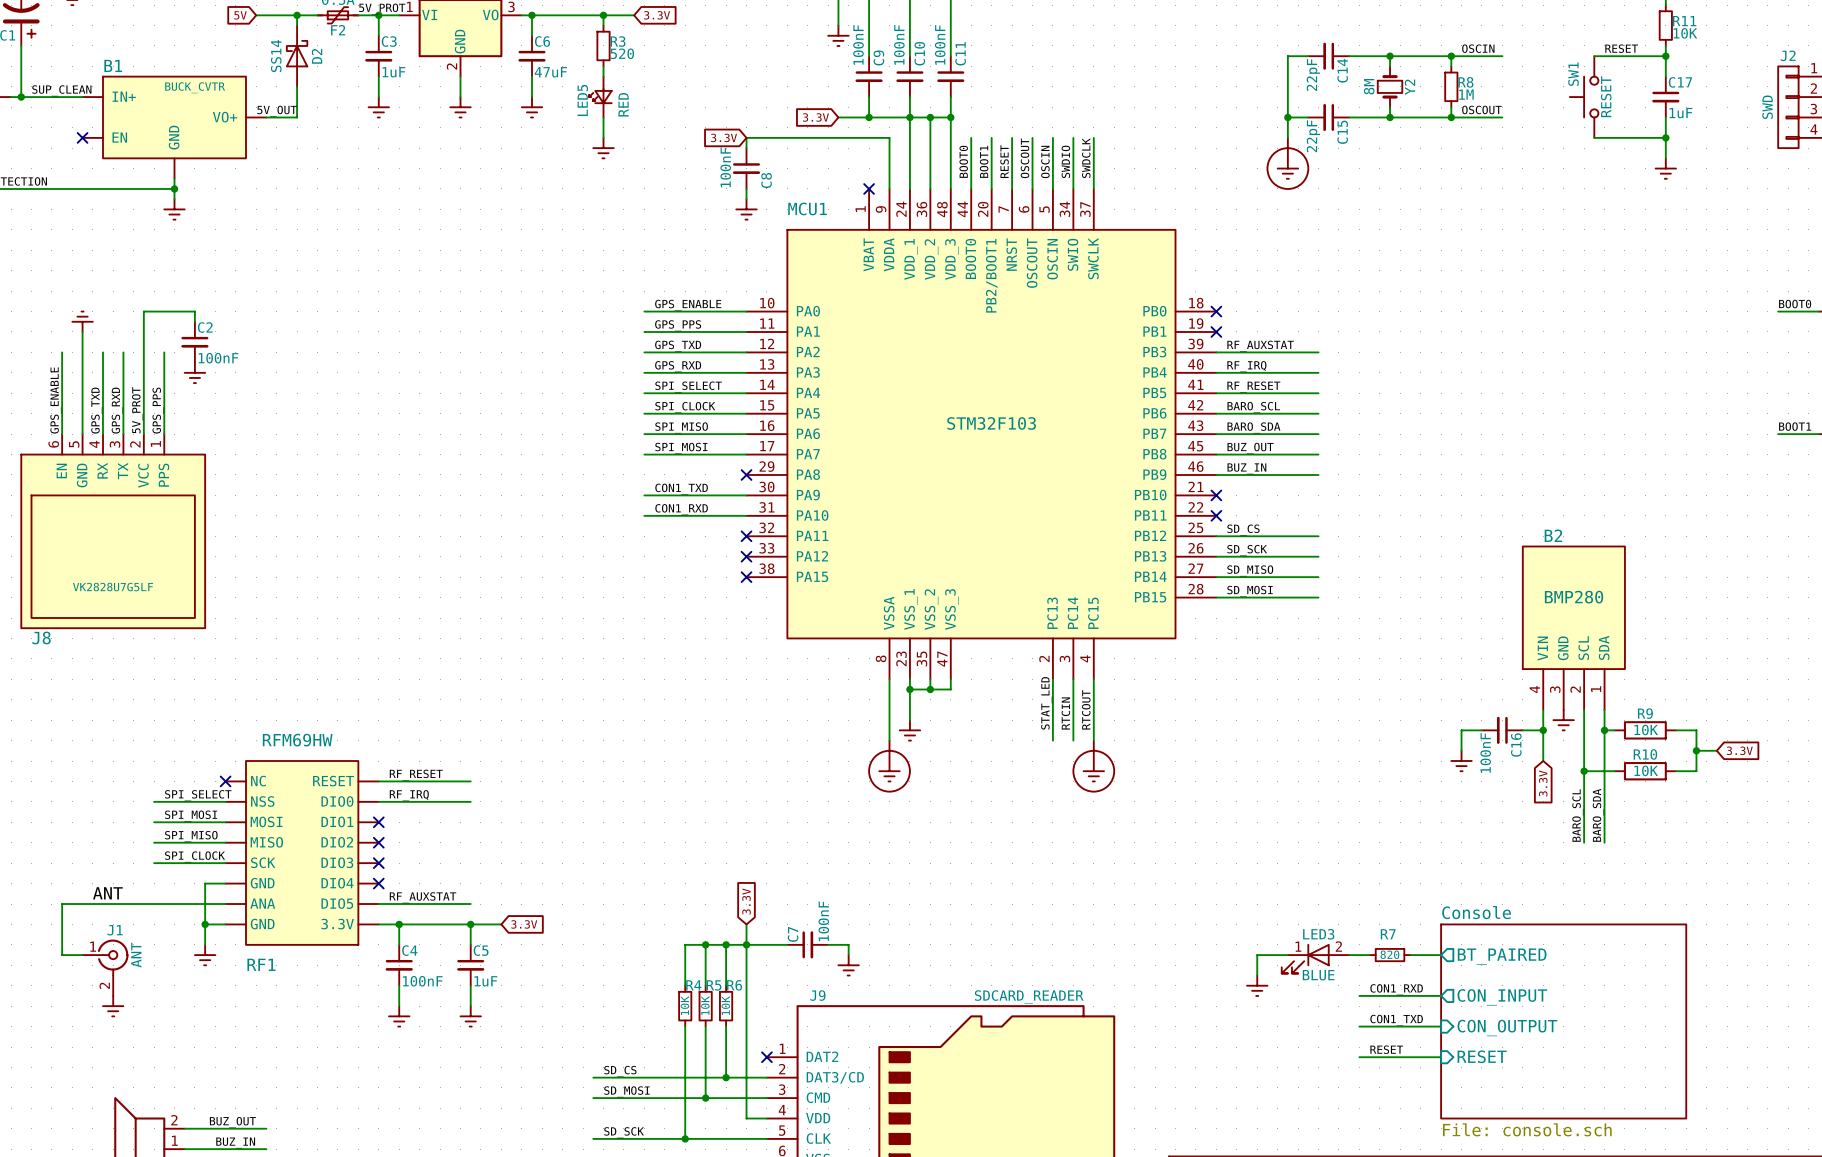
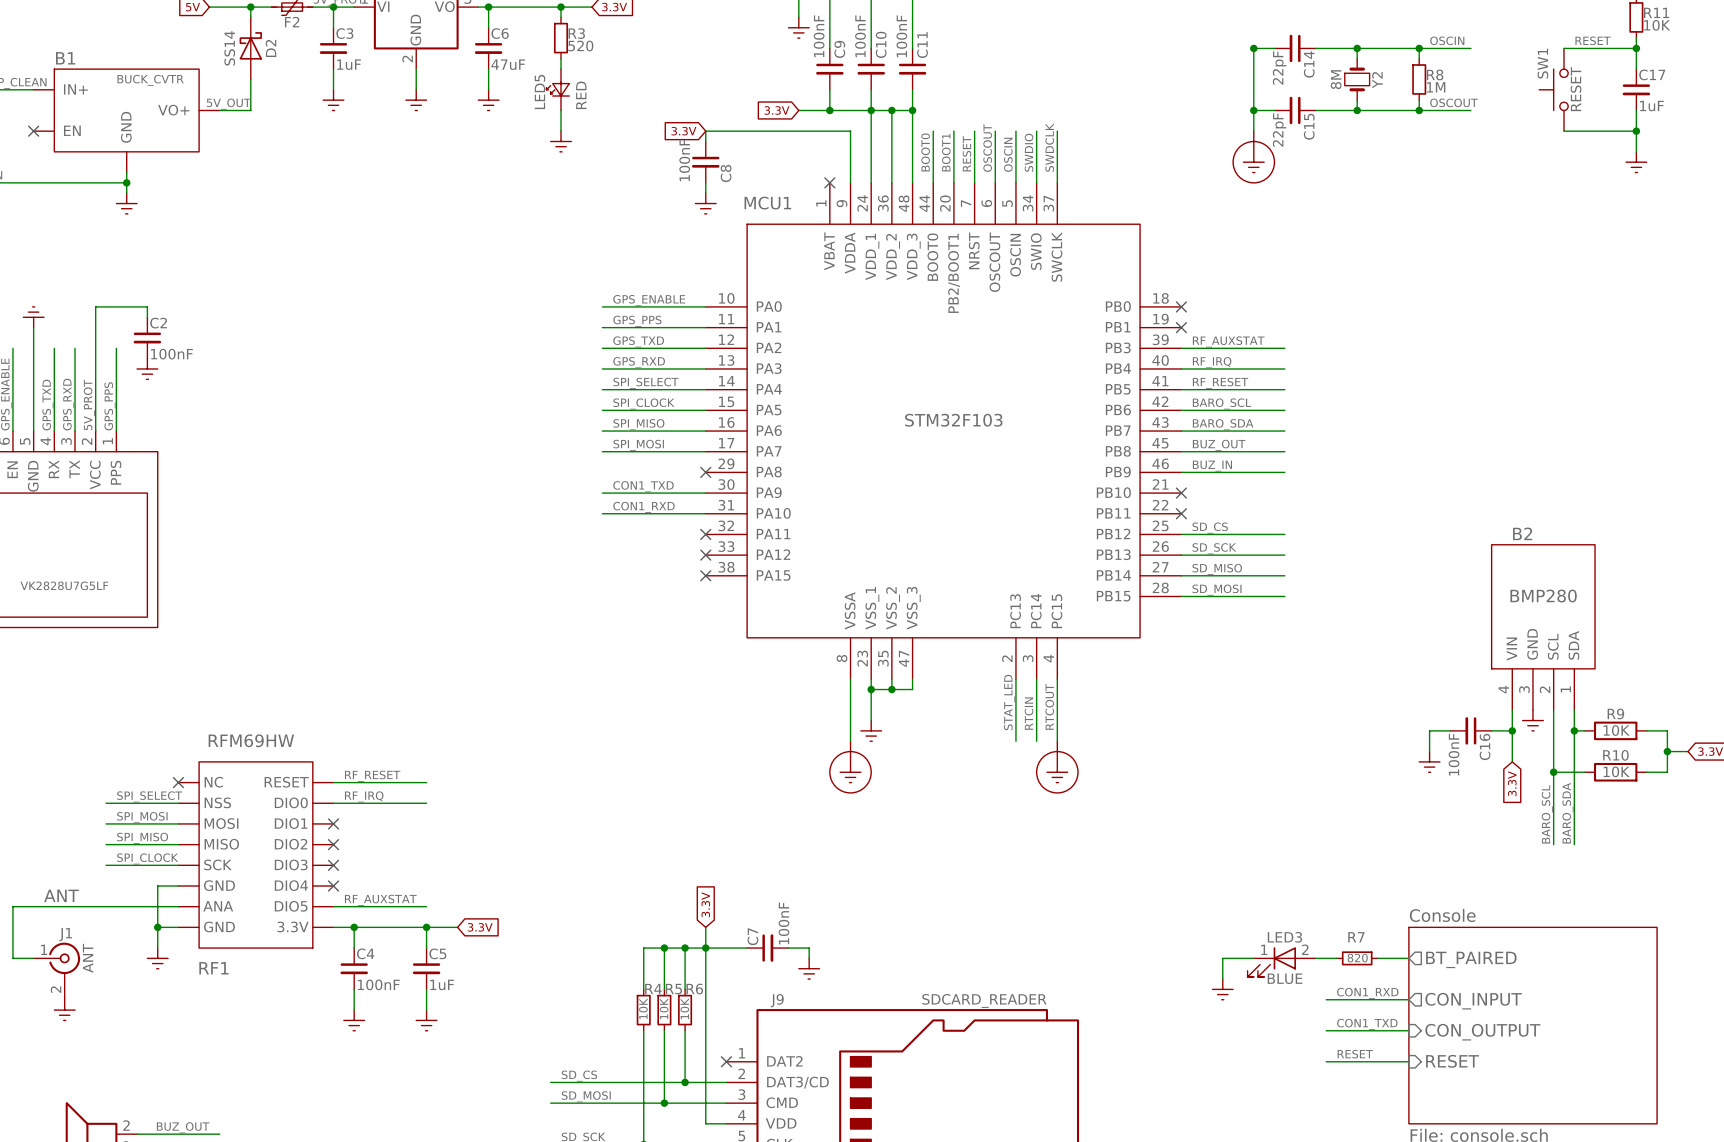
junction: none -> (1253, 48)

